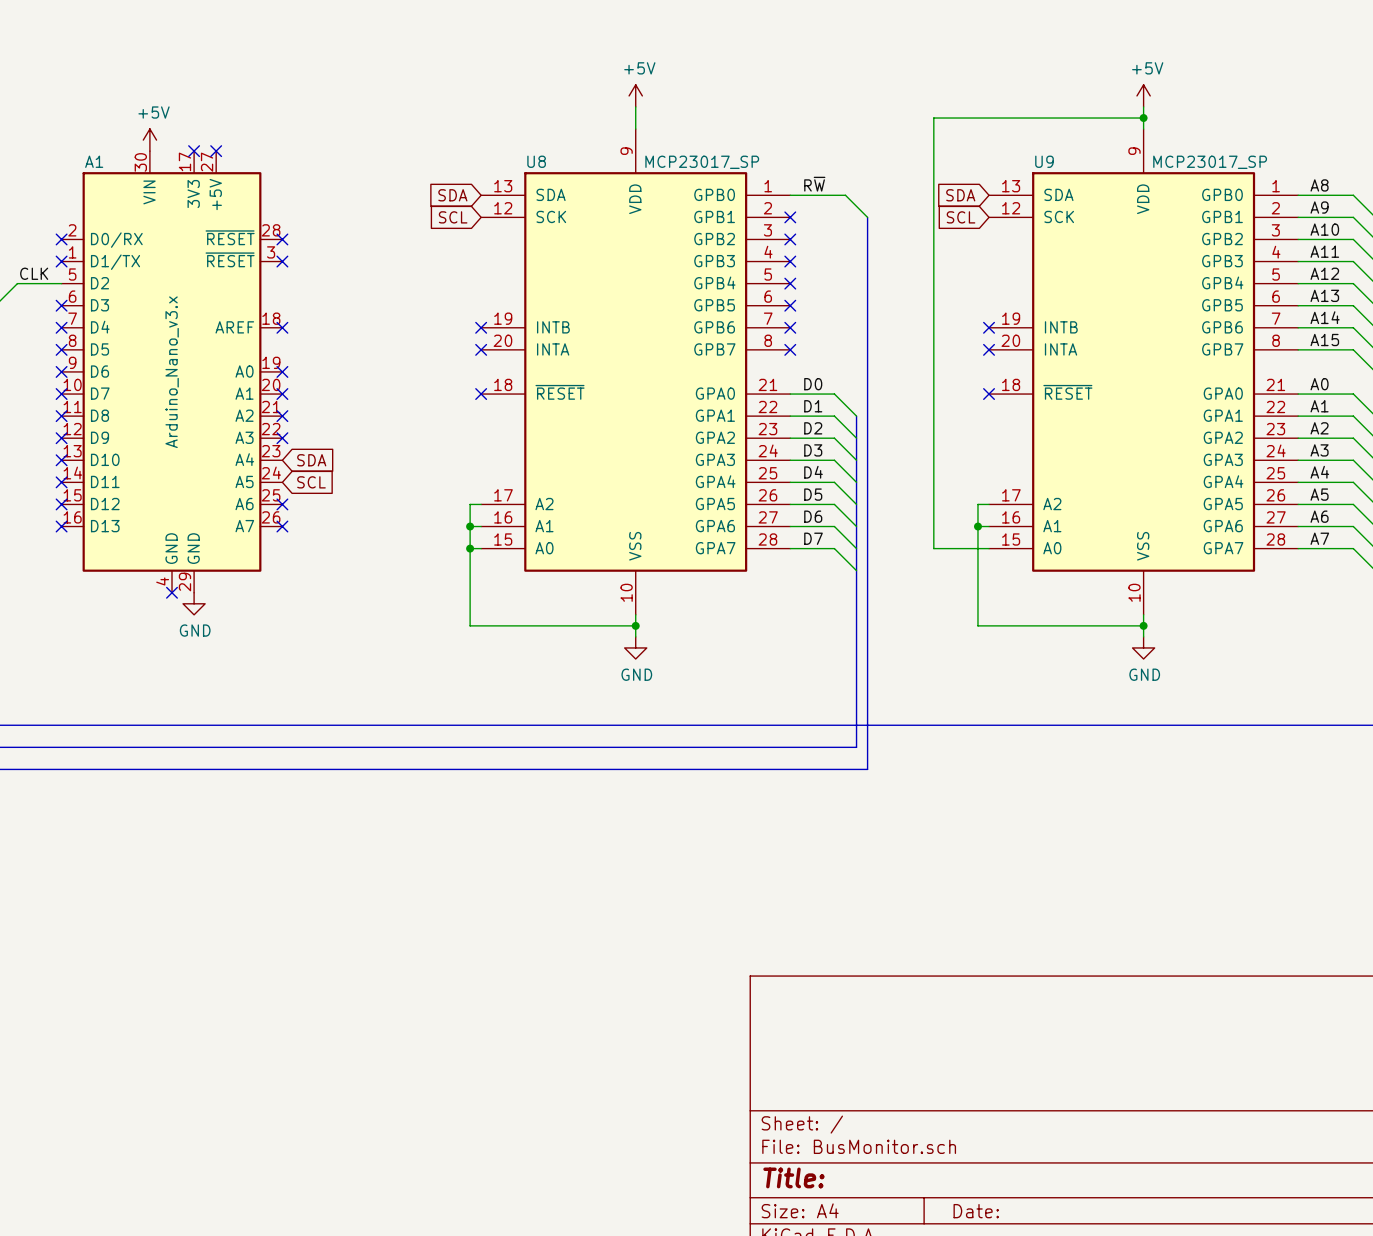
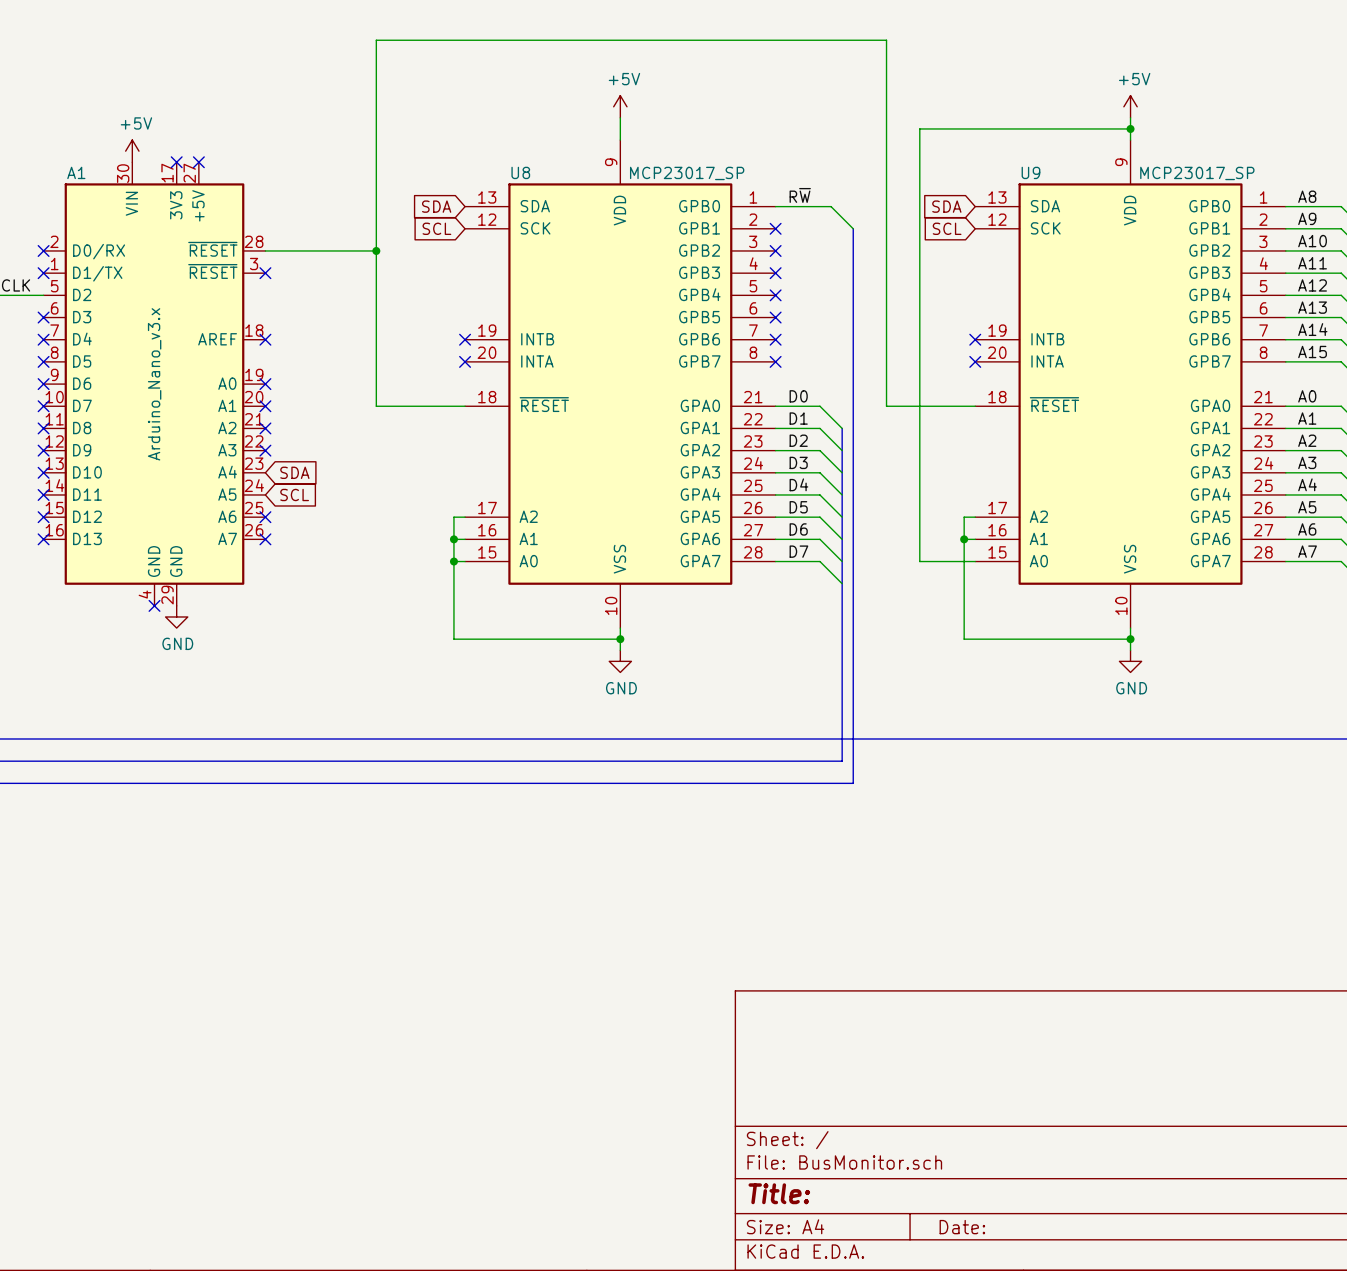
wire: none -> (265, 250) (376, 250)
no-connect mark: (282, 239) -> none
junction: none -> (376, 250)
wire: none -> (465, 406) (376, 406) (376, 40) (886, 40) (886, 406) (975, 406)
no-connect mark: (481, 394) -> none
no-connect mark: (989, 394) -> none

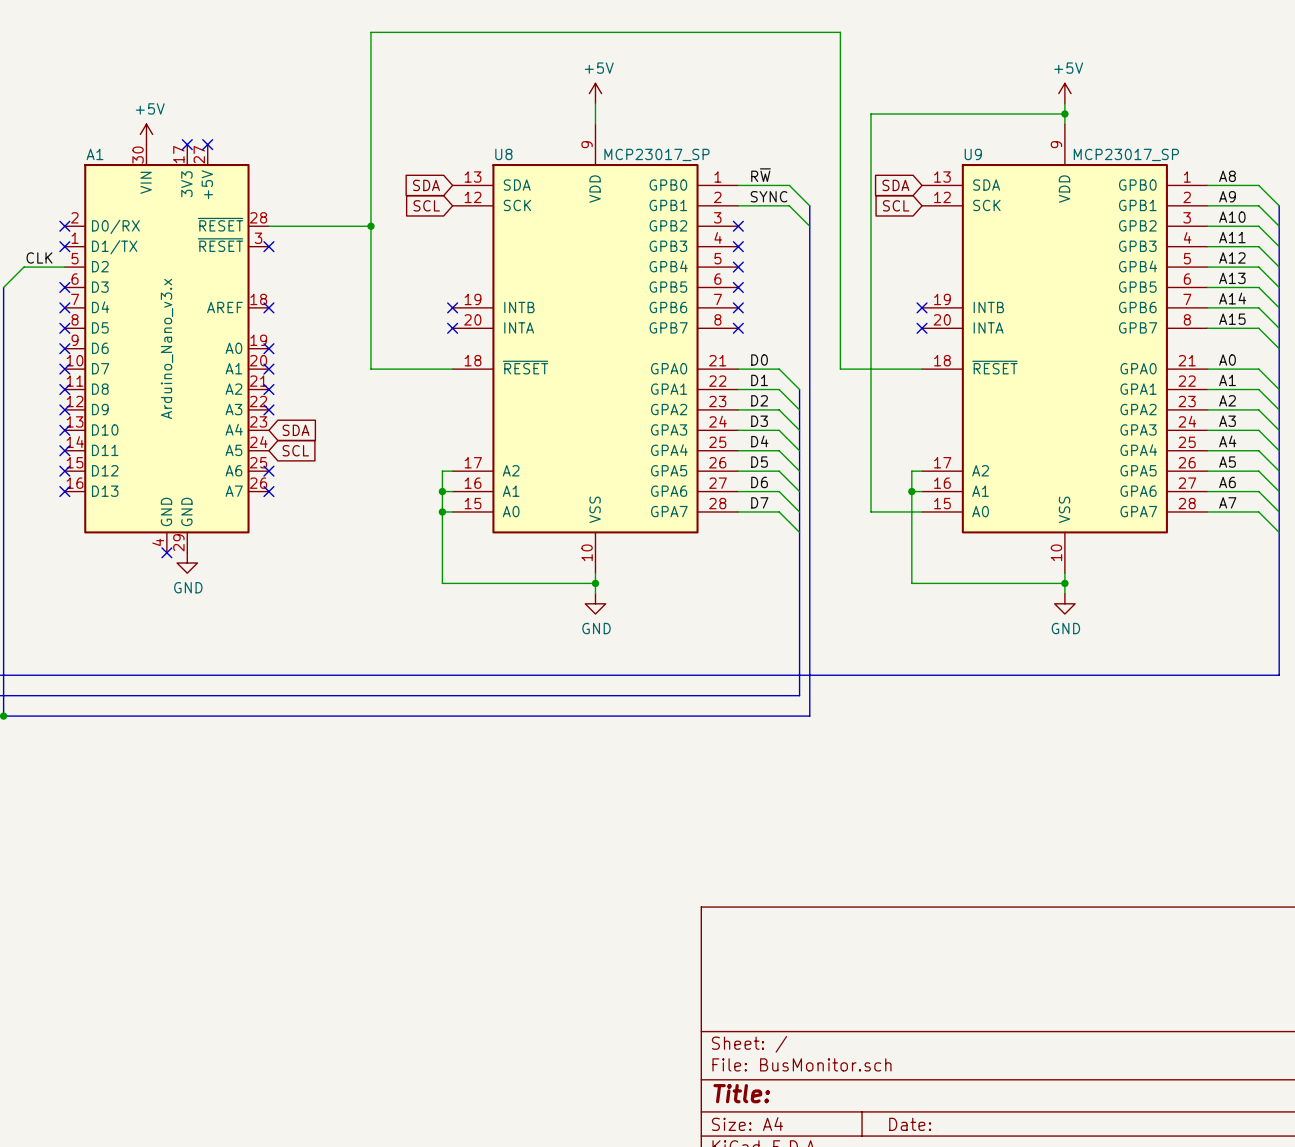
label: none -> SYNC (769, 196)
wire: none -> (738, 205) (789, 205) (809, 226)
no-connect mark: (775, 228) -> none

